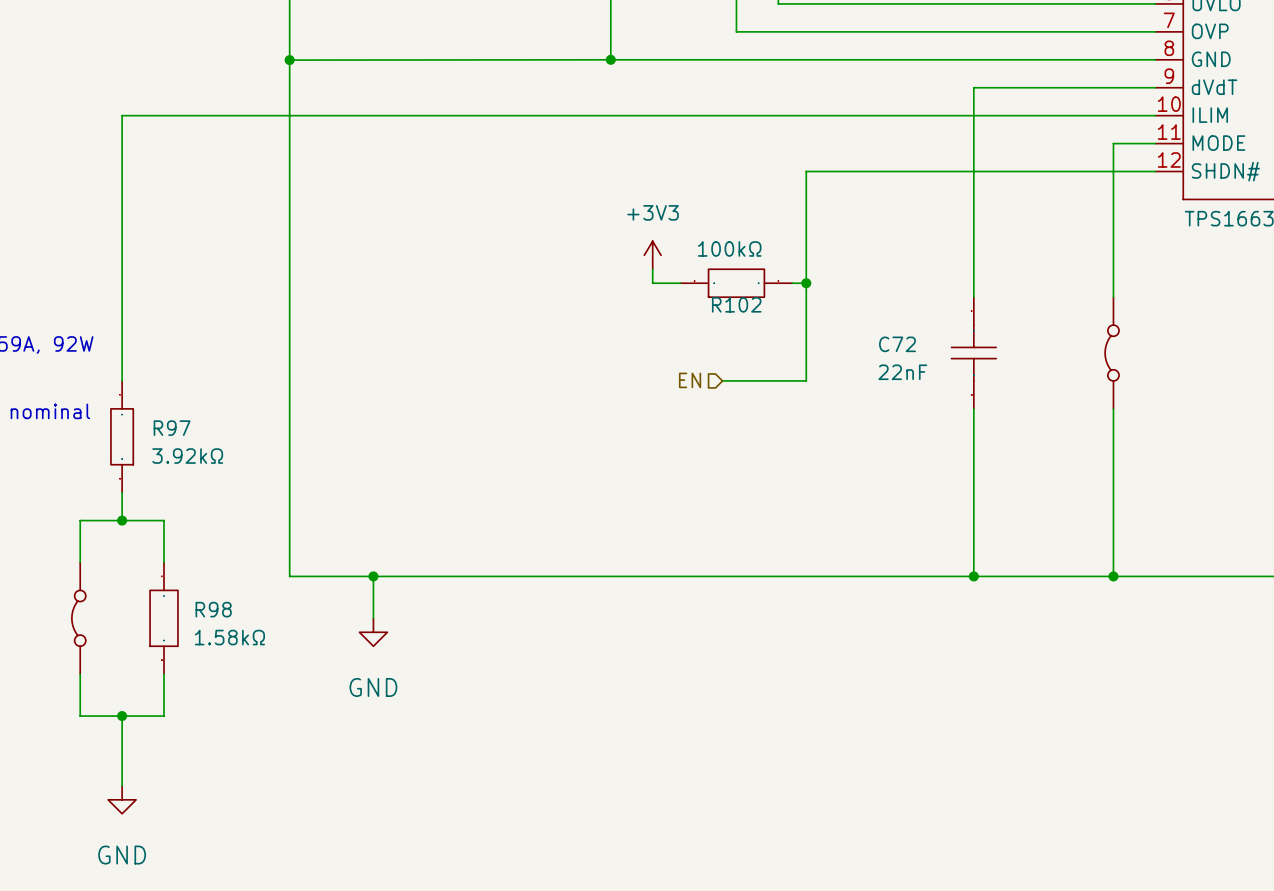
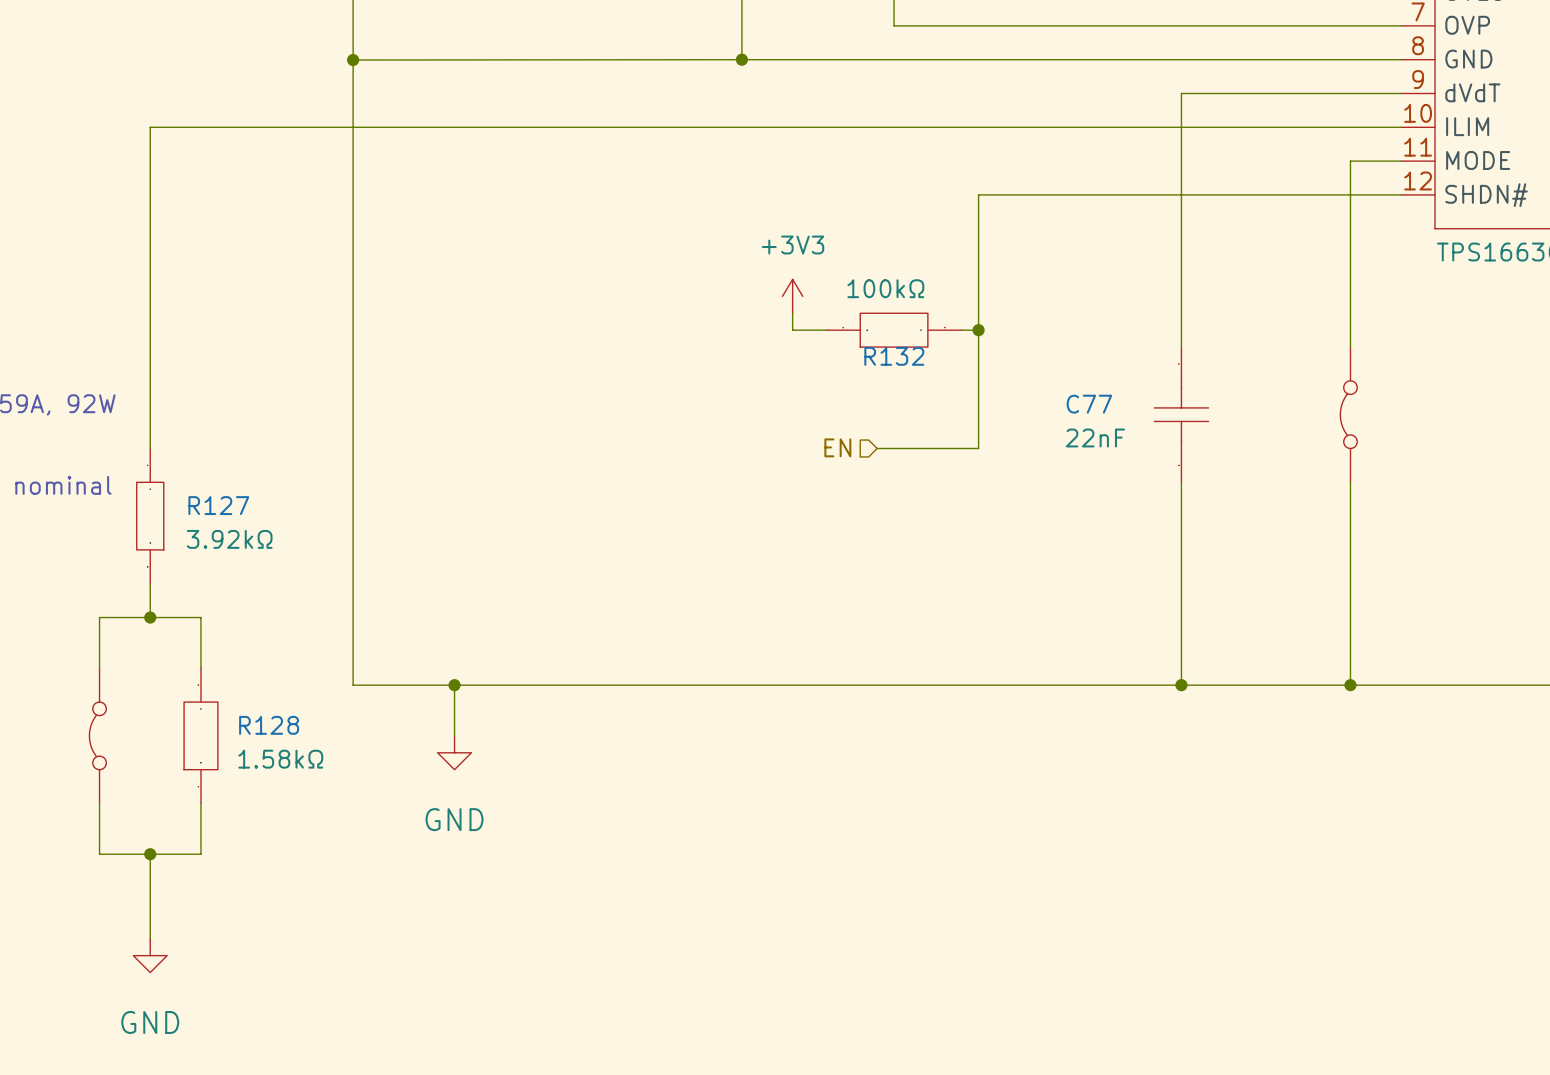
R102 name: R102 (736, 304) -> R132 (894, 356)
C72 name: C72 (897, 344) -> C77 (1089, 404)
R97 name: R97 (172, 428) -> R127 (218, 505)
R98 name: R98 (213, 609) -> R128 (269, 725)

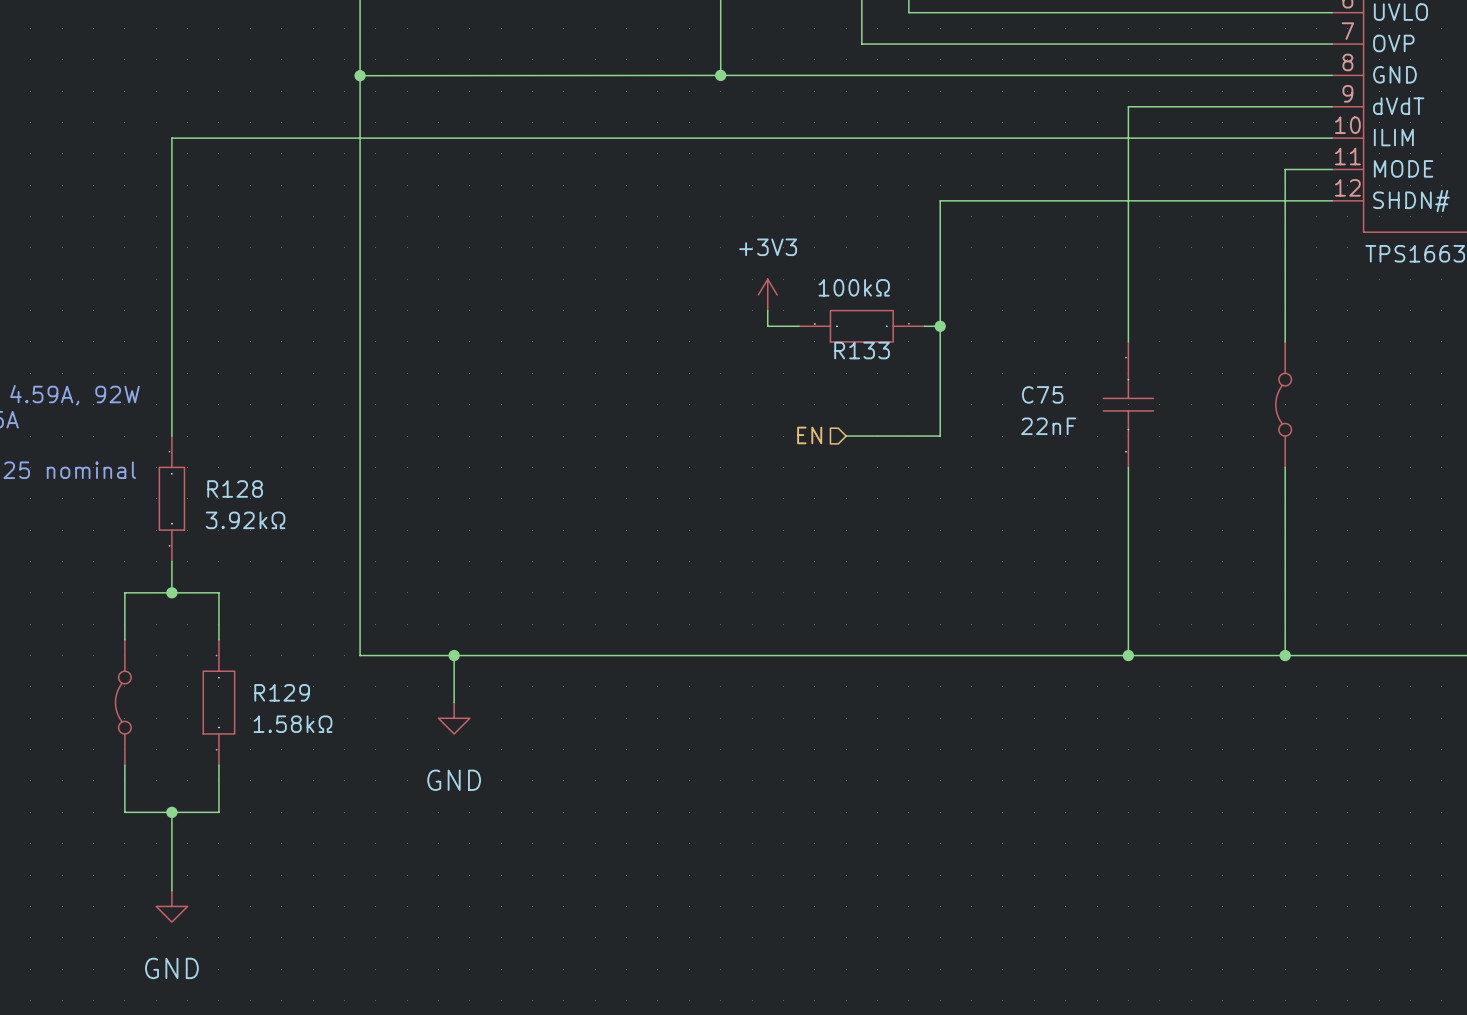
R132 name: R132 (894, 356) -> R133 (862, 350)
C77 name: C77 (1089, 404) -> C75 (1042, 394)
R127 name: R127 (218, 505) -> R128 (235, 488)
R128 name: R128 (269, 725) -> R129 (282, 692)

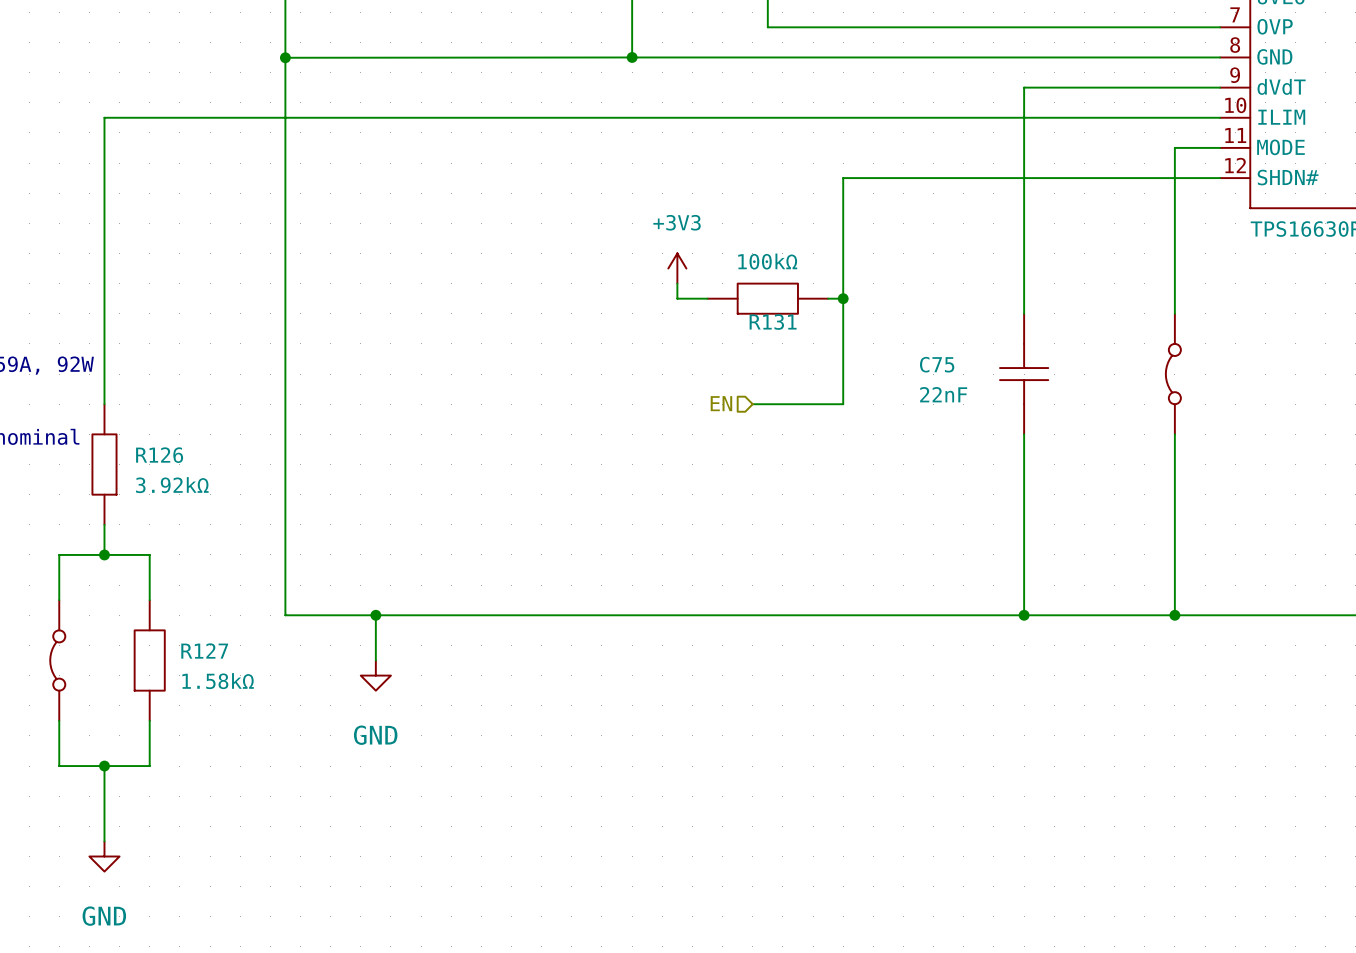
R133 name: R133 (862, 350) -> R131 (773, 322)
R128 name: R128 (235, 488) -> R126 (159, 455)
R129 name: R129 (282, 692) -> R127 (204, 650)

